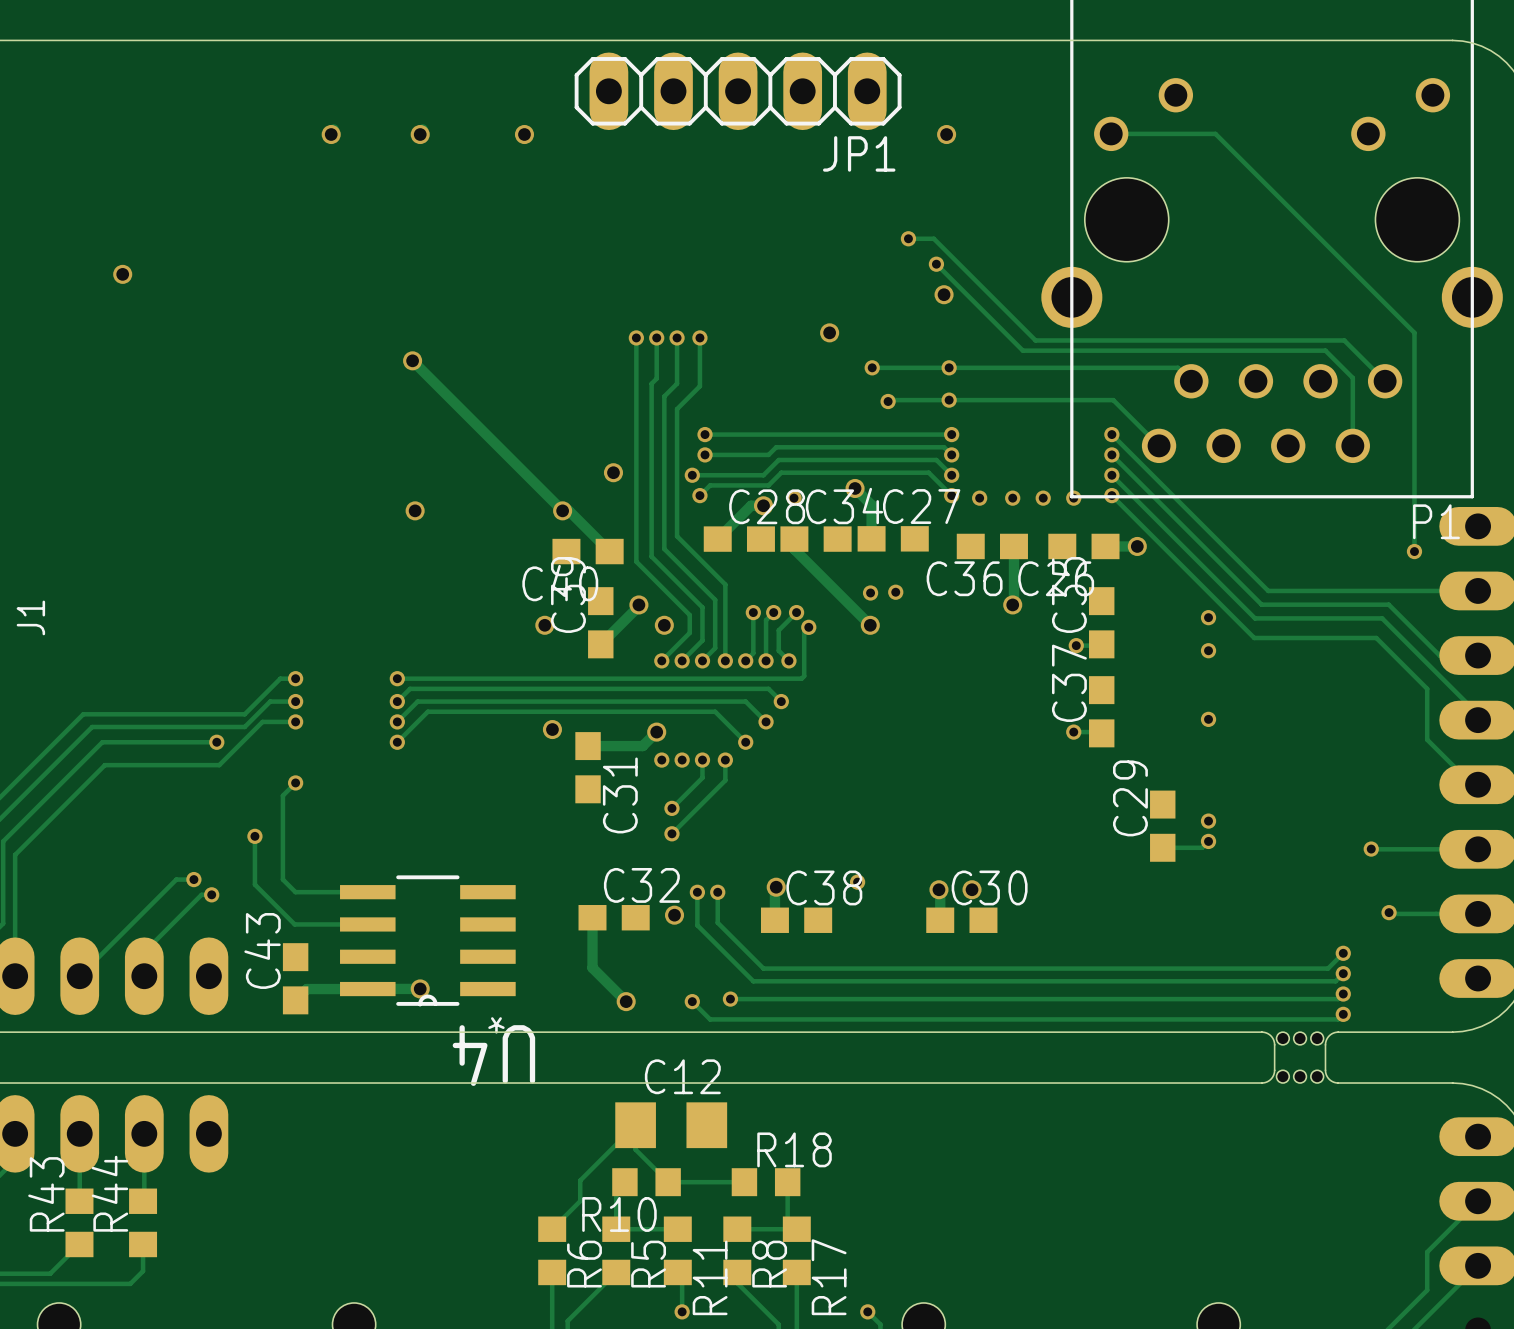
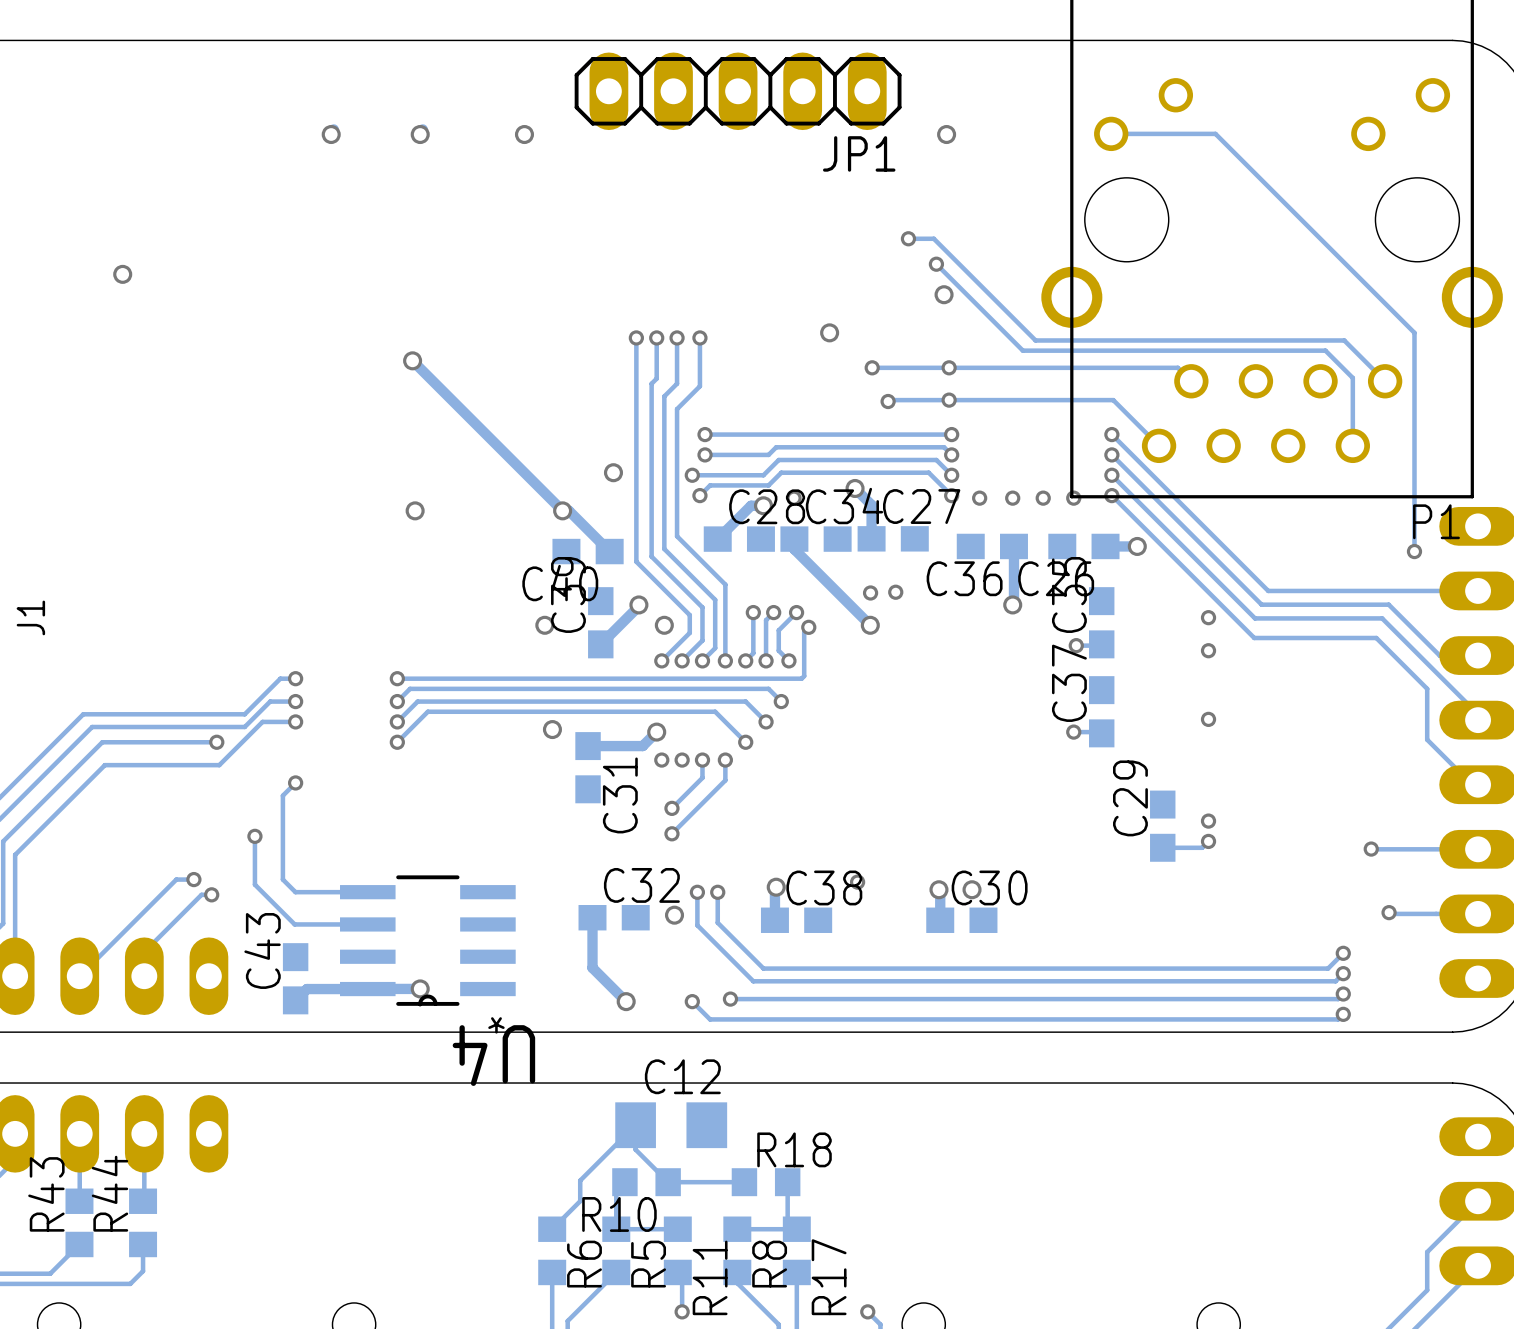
board edge: (1261, 1032) (1270, 1035) (1274, 1044) (1274, 1073) (1269, 1080) (1261, 1083) -> (1338, 1083) (1261, 1083)
board edge: (1338, 1032) (1329, 1035) (1325, 1044) (1325, 1073) (1330, 1080) (1338, 1083) -> (1338, 1032) (1261, 1032)
hole: (1282, 1038) -> none
hole: (1300, 1038) -> none
hole: (1317, 1038) -> none
hole: (1282, 1076) -> none
hole: (1300, 1076) -> none
hole: (1317, 1076) -> none

